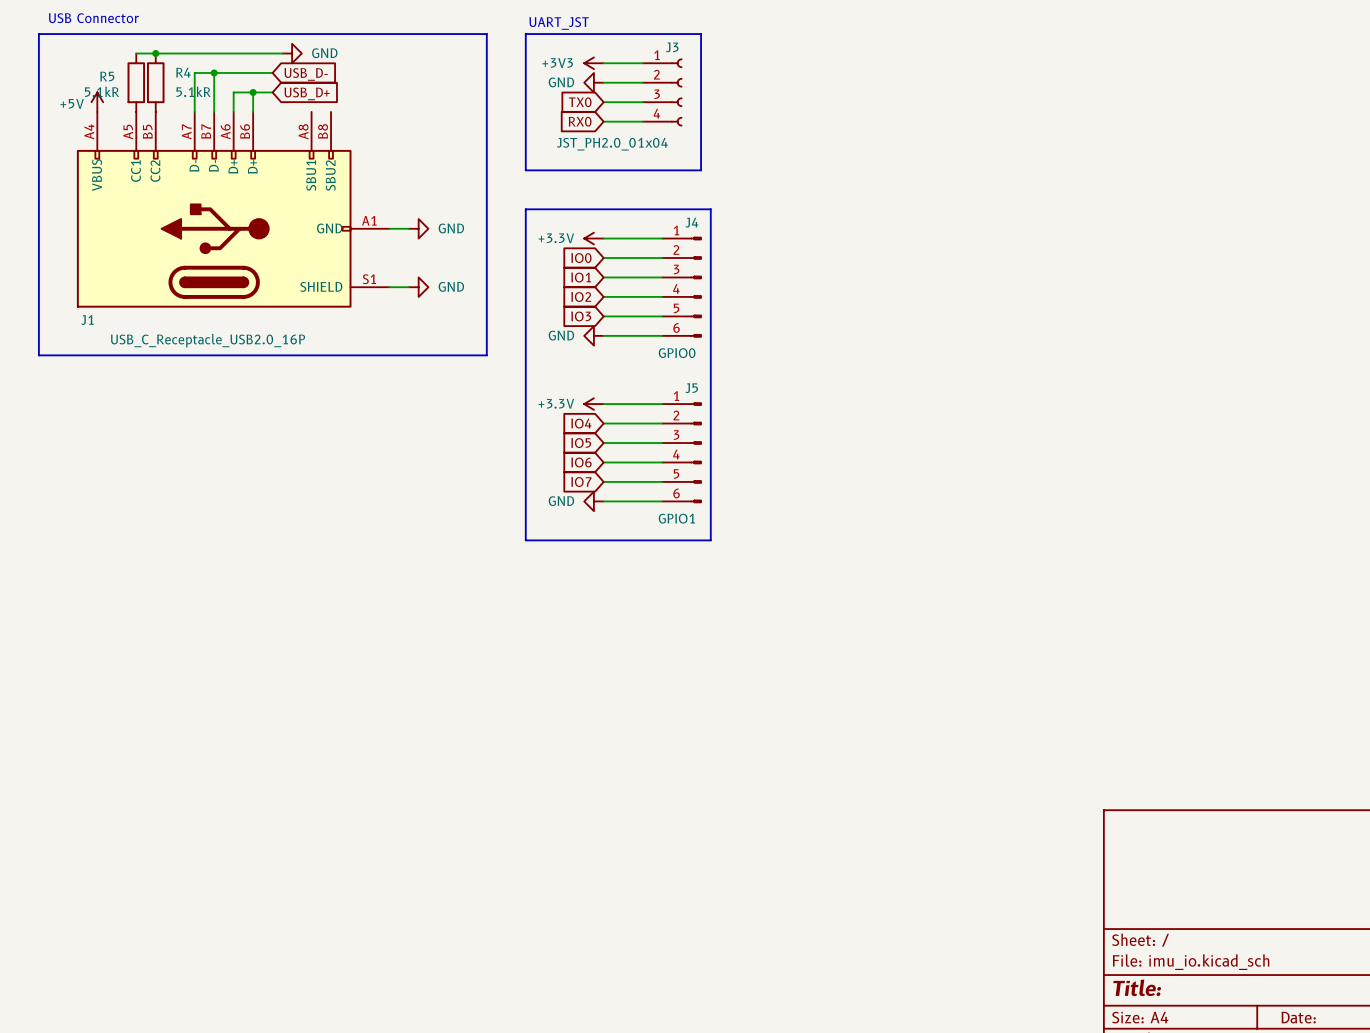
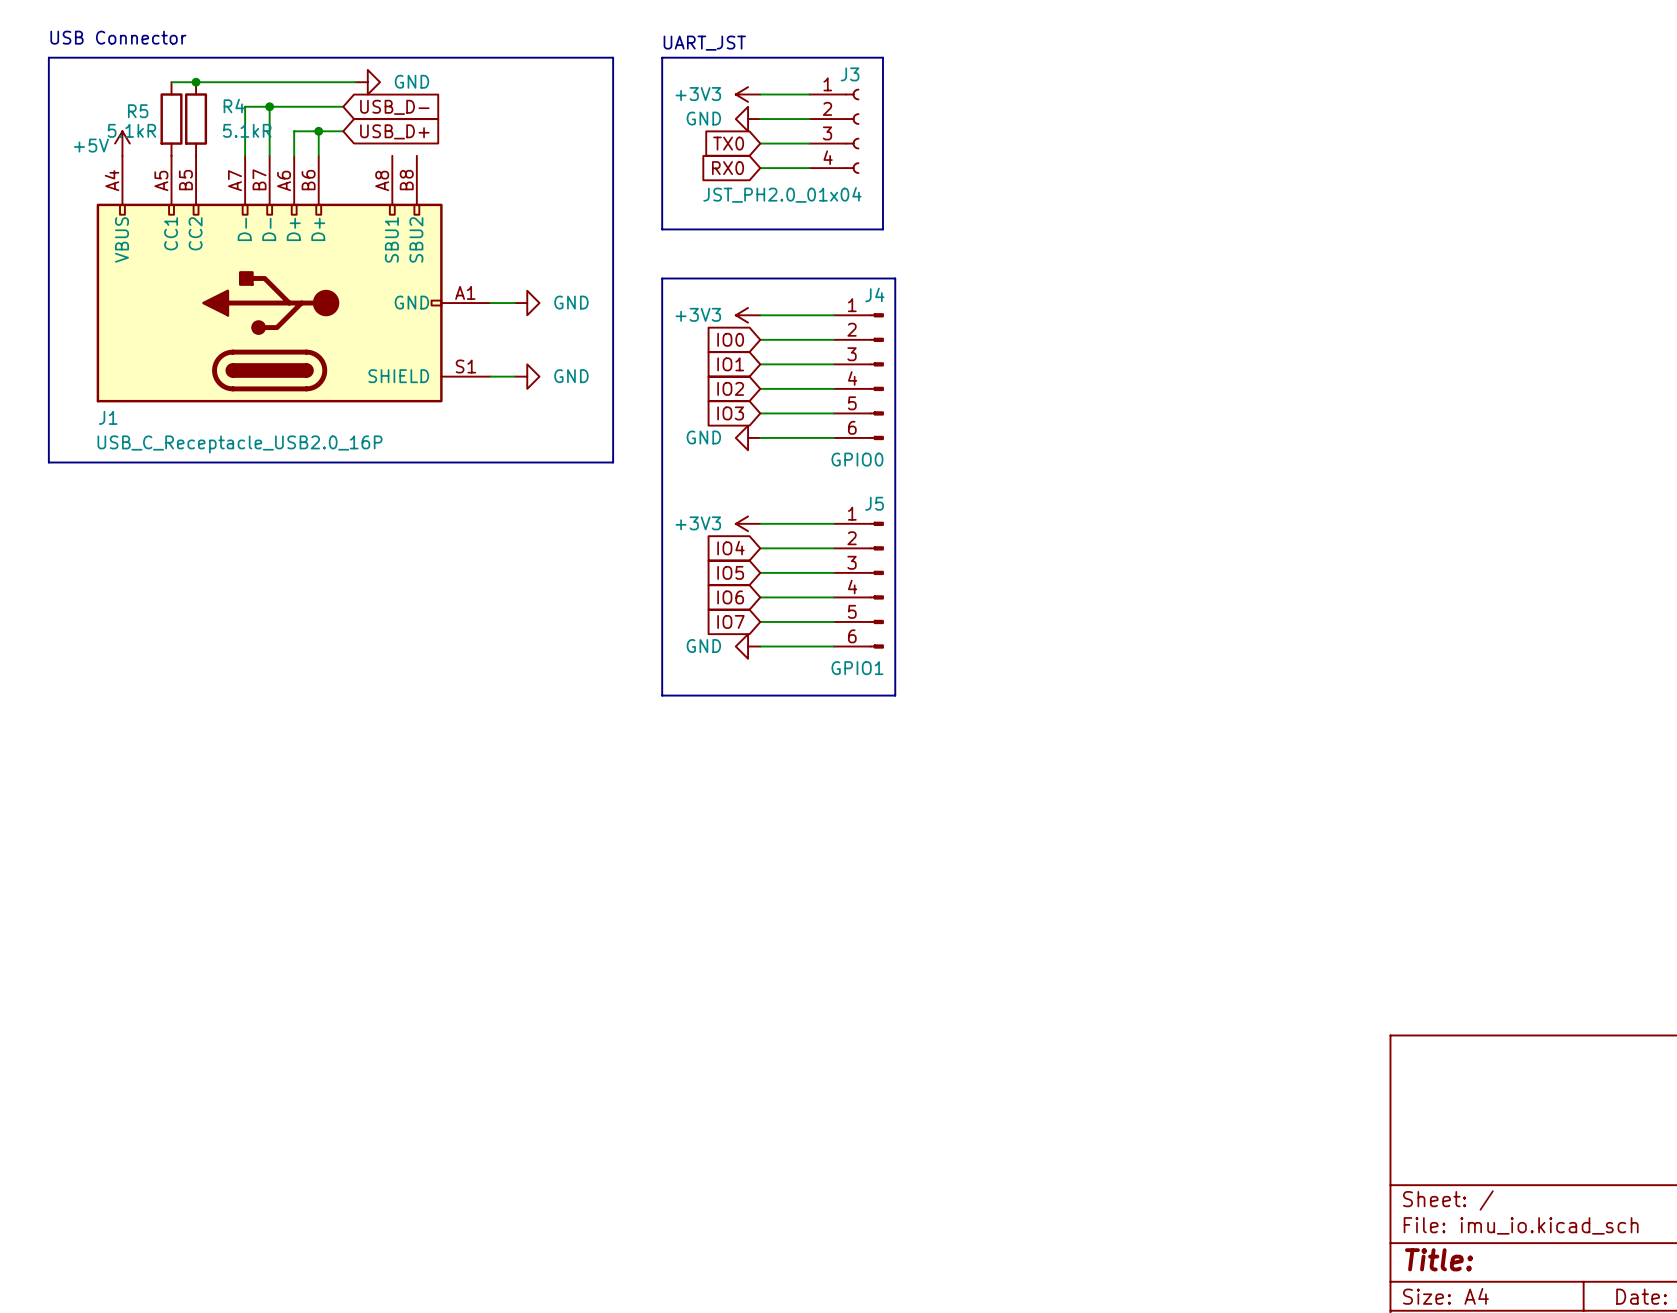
power symbol: +3.3V (593, 238) -> +3V3 (748, 315)
power symbol: +3.3V (593, 404) -> +3V3 (748, 523)

